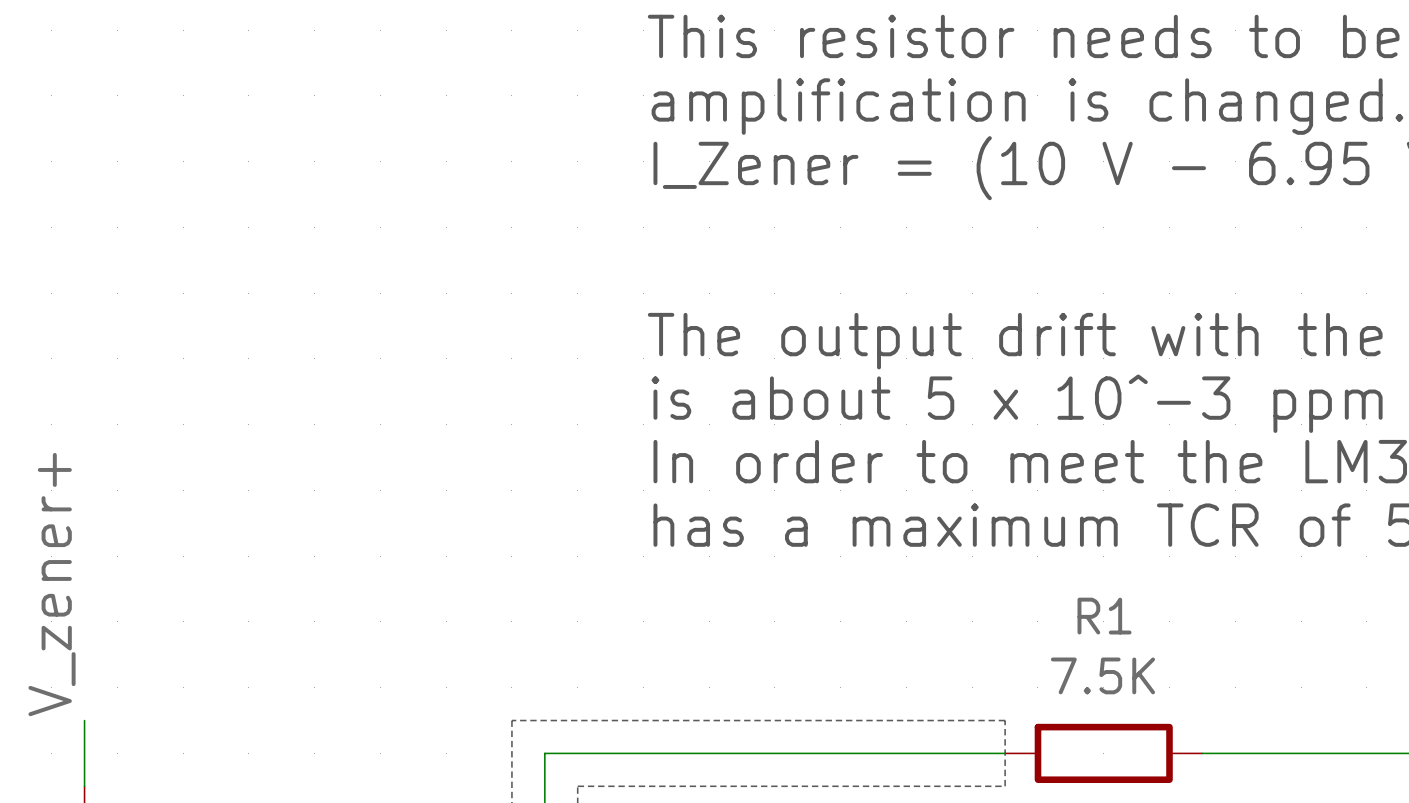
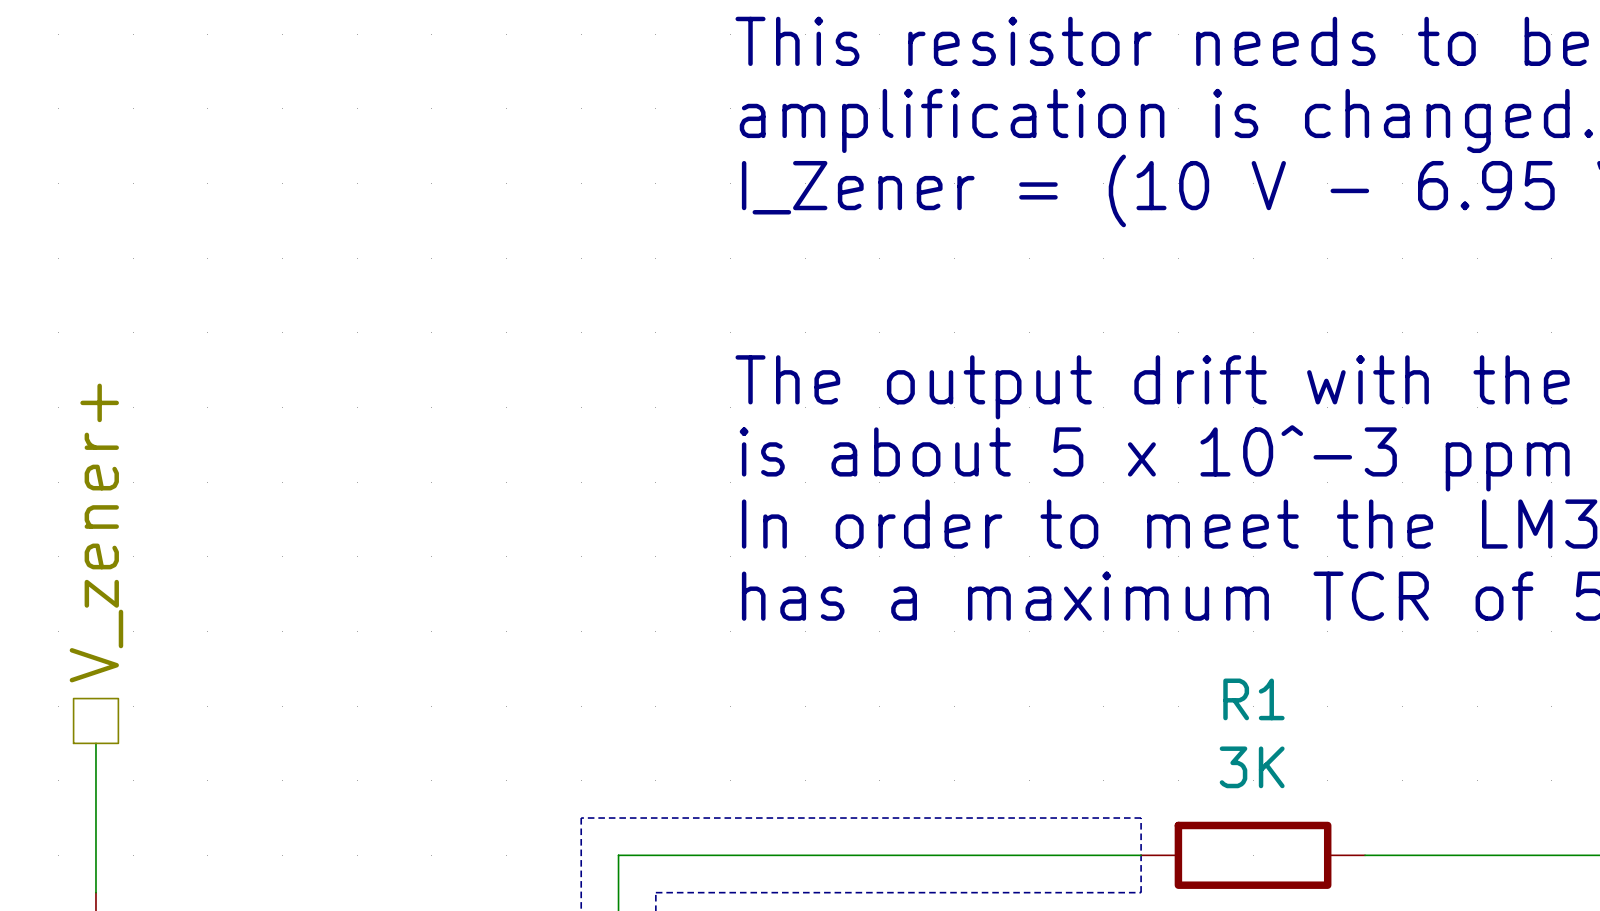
hierarchical label: none -> V_zener+ (96, 533)
label: V_zener+ (52, 584) -> none
wire: none -> (95, 743) (95, 818)
R1 value: 7.5K (1102, 675) -> 3K (1252, 767)

